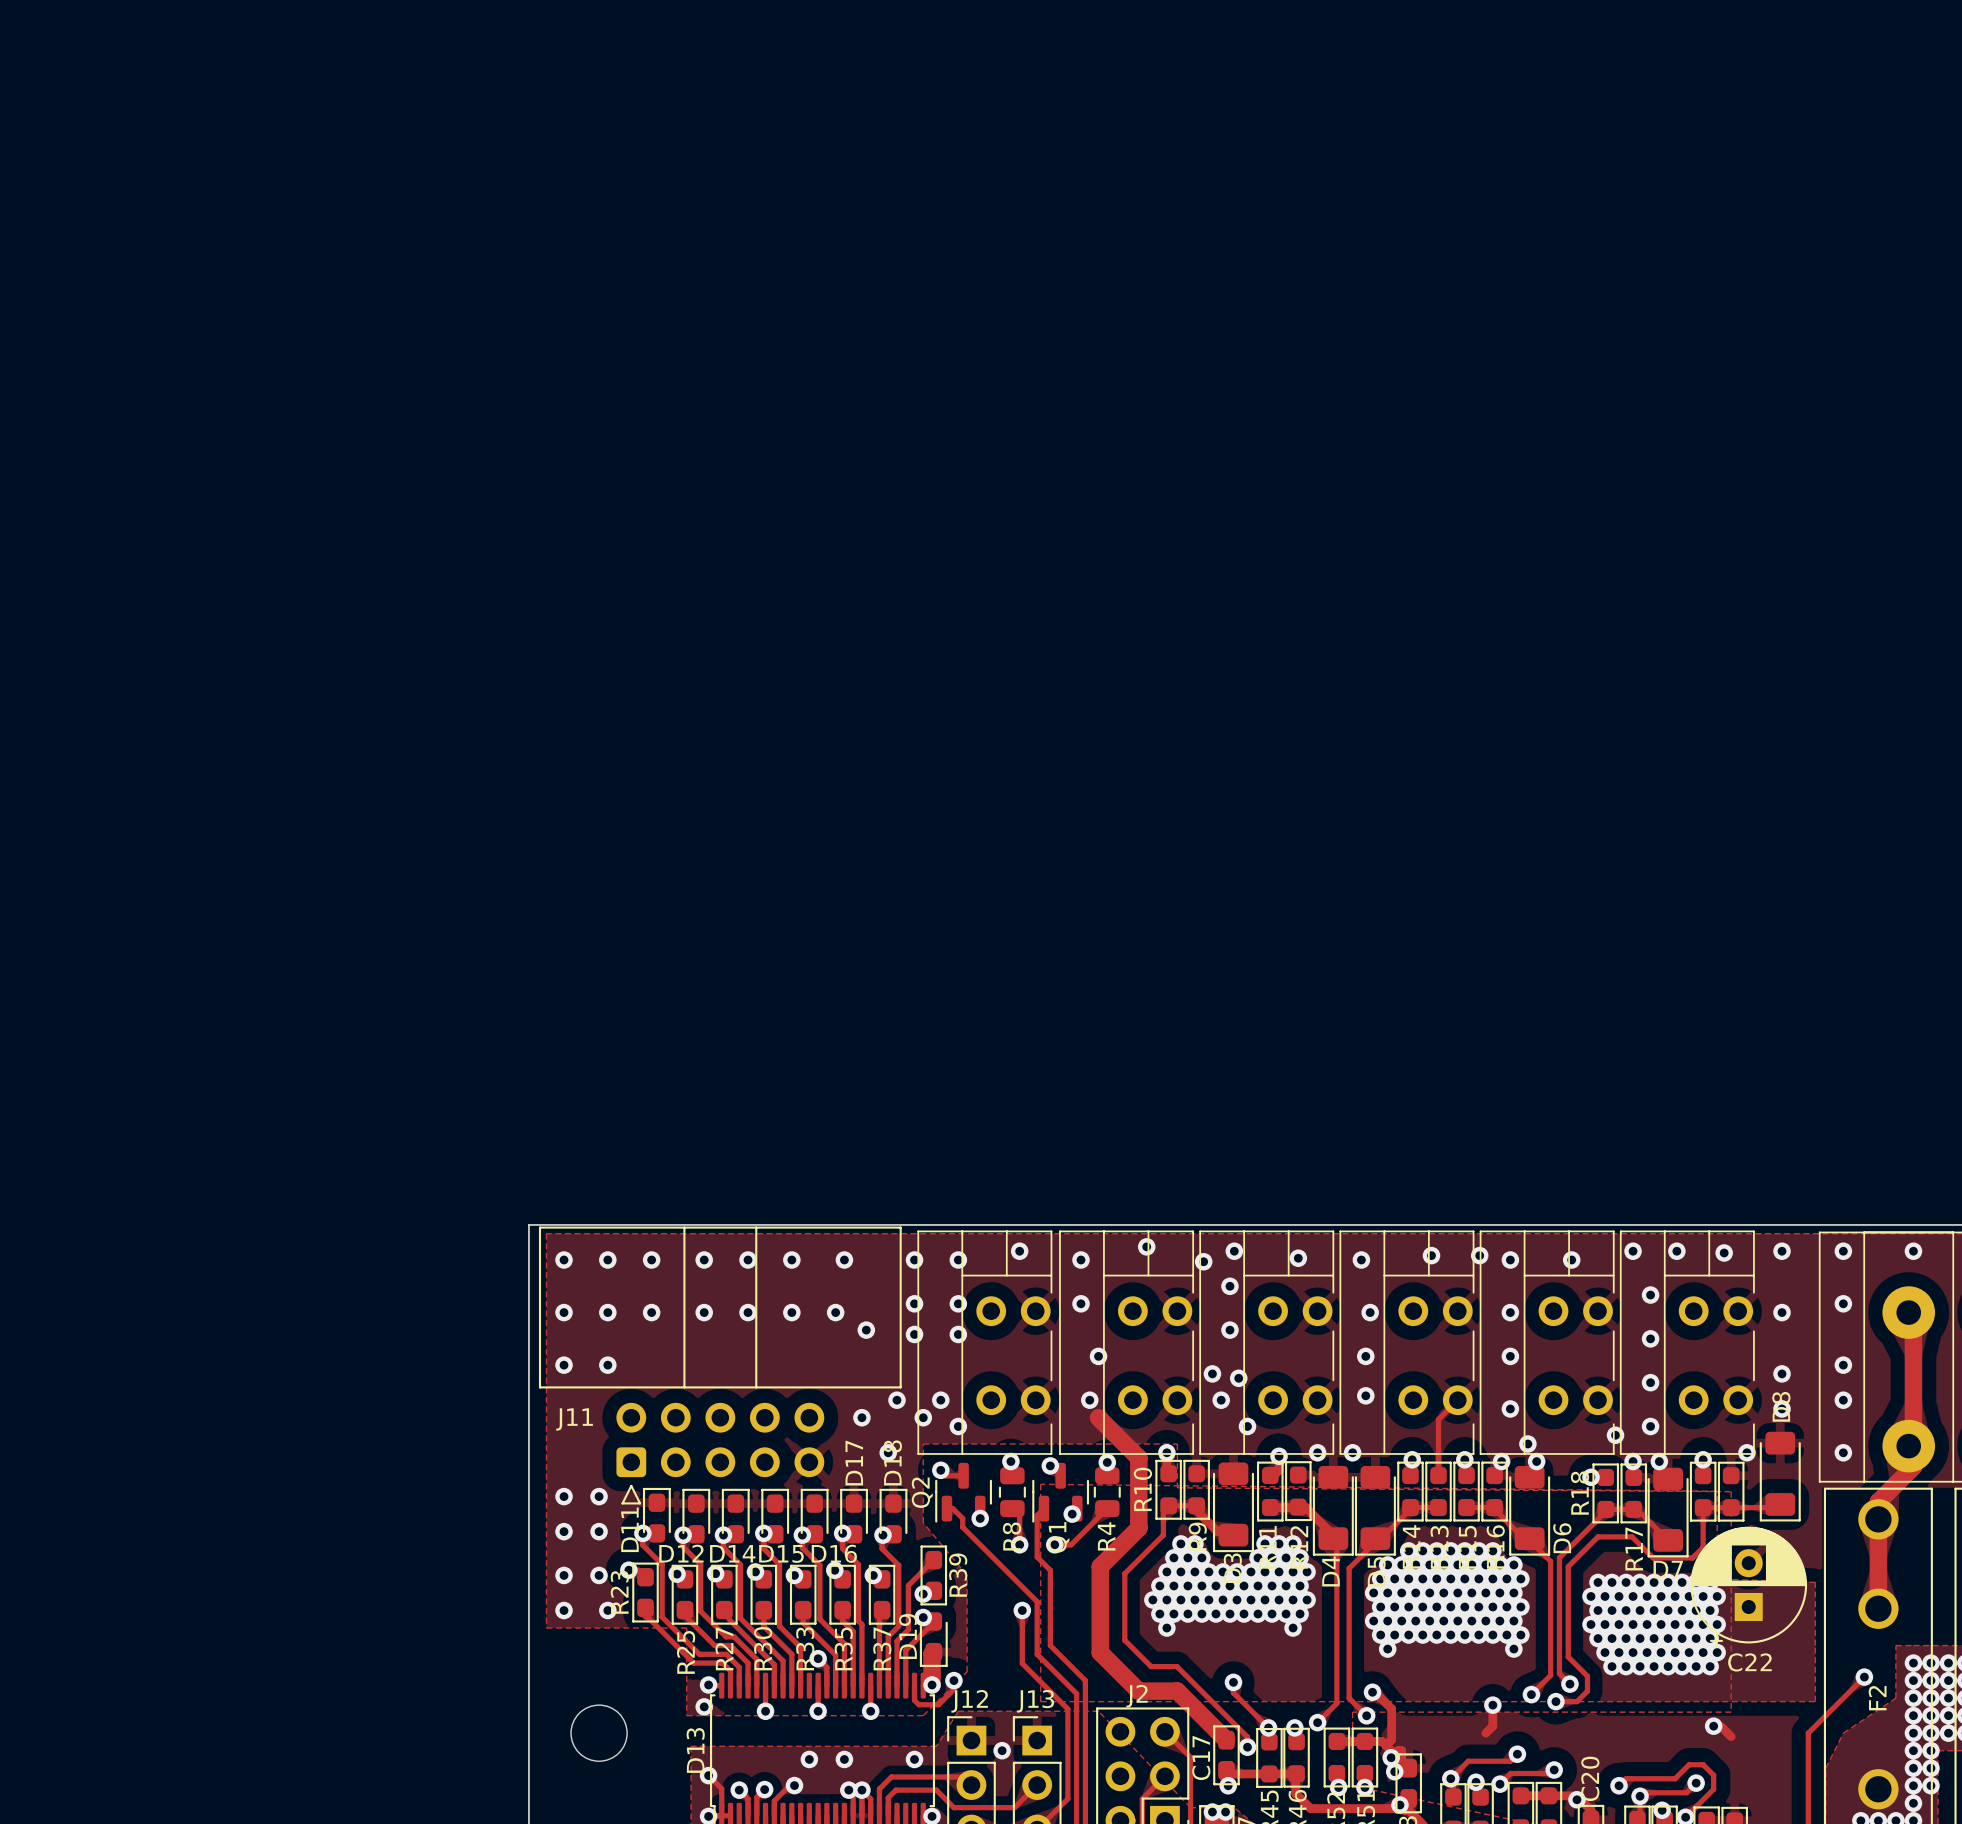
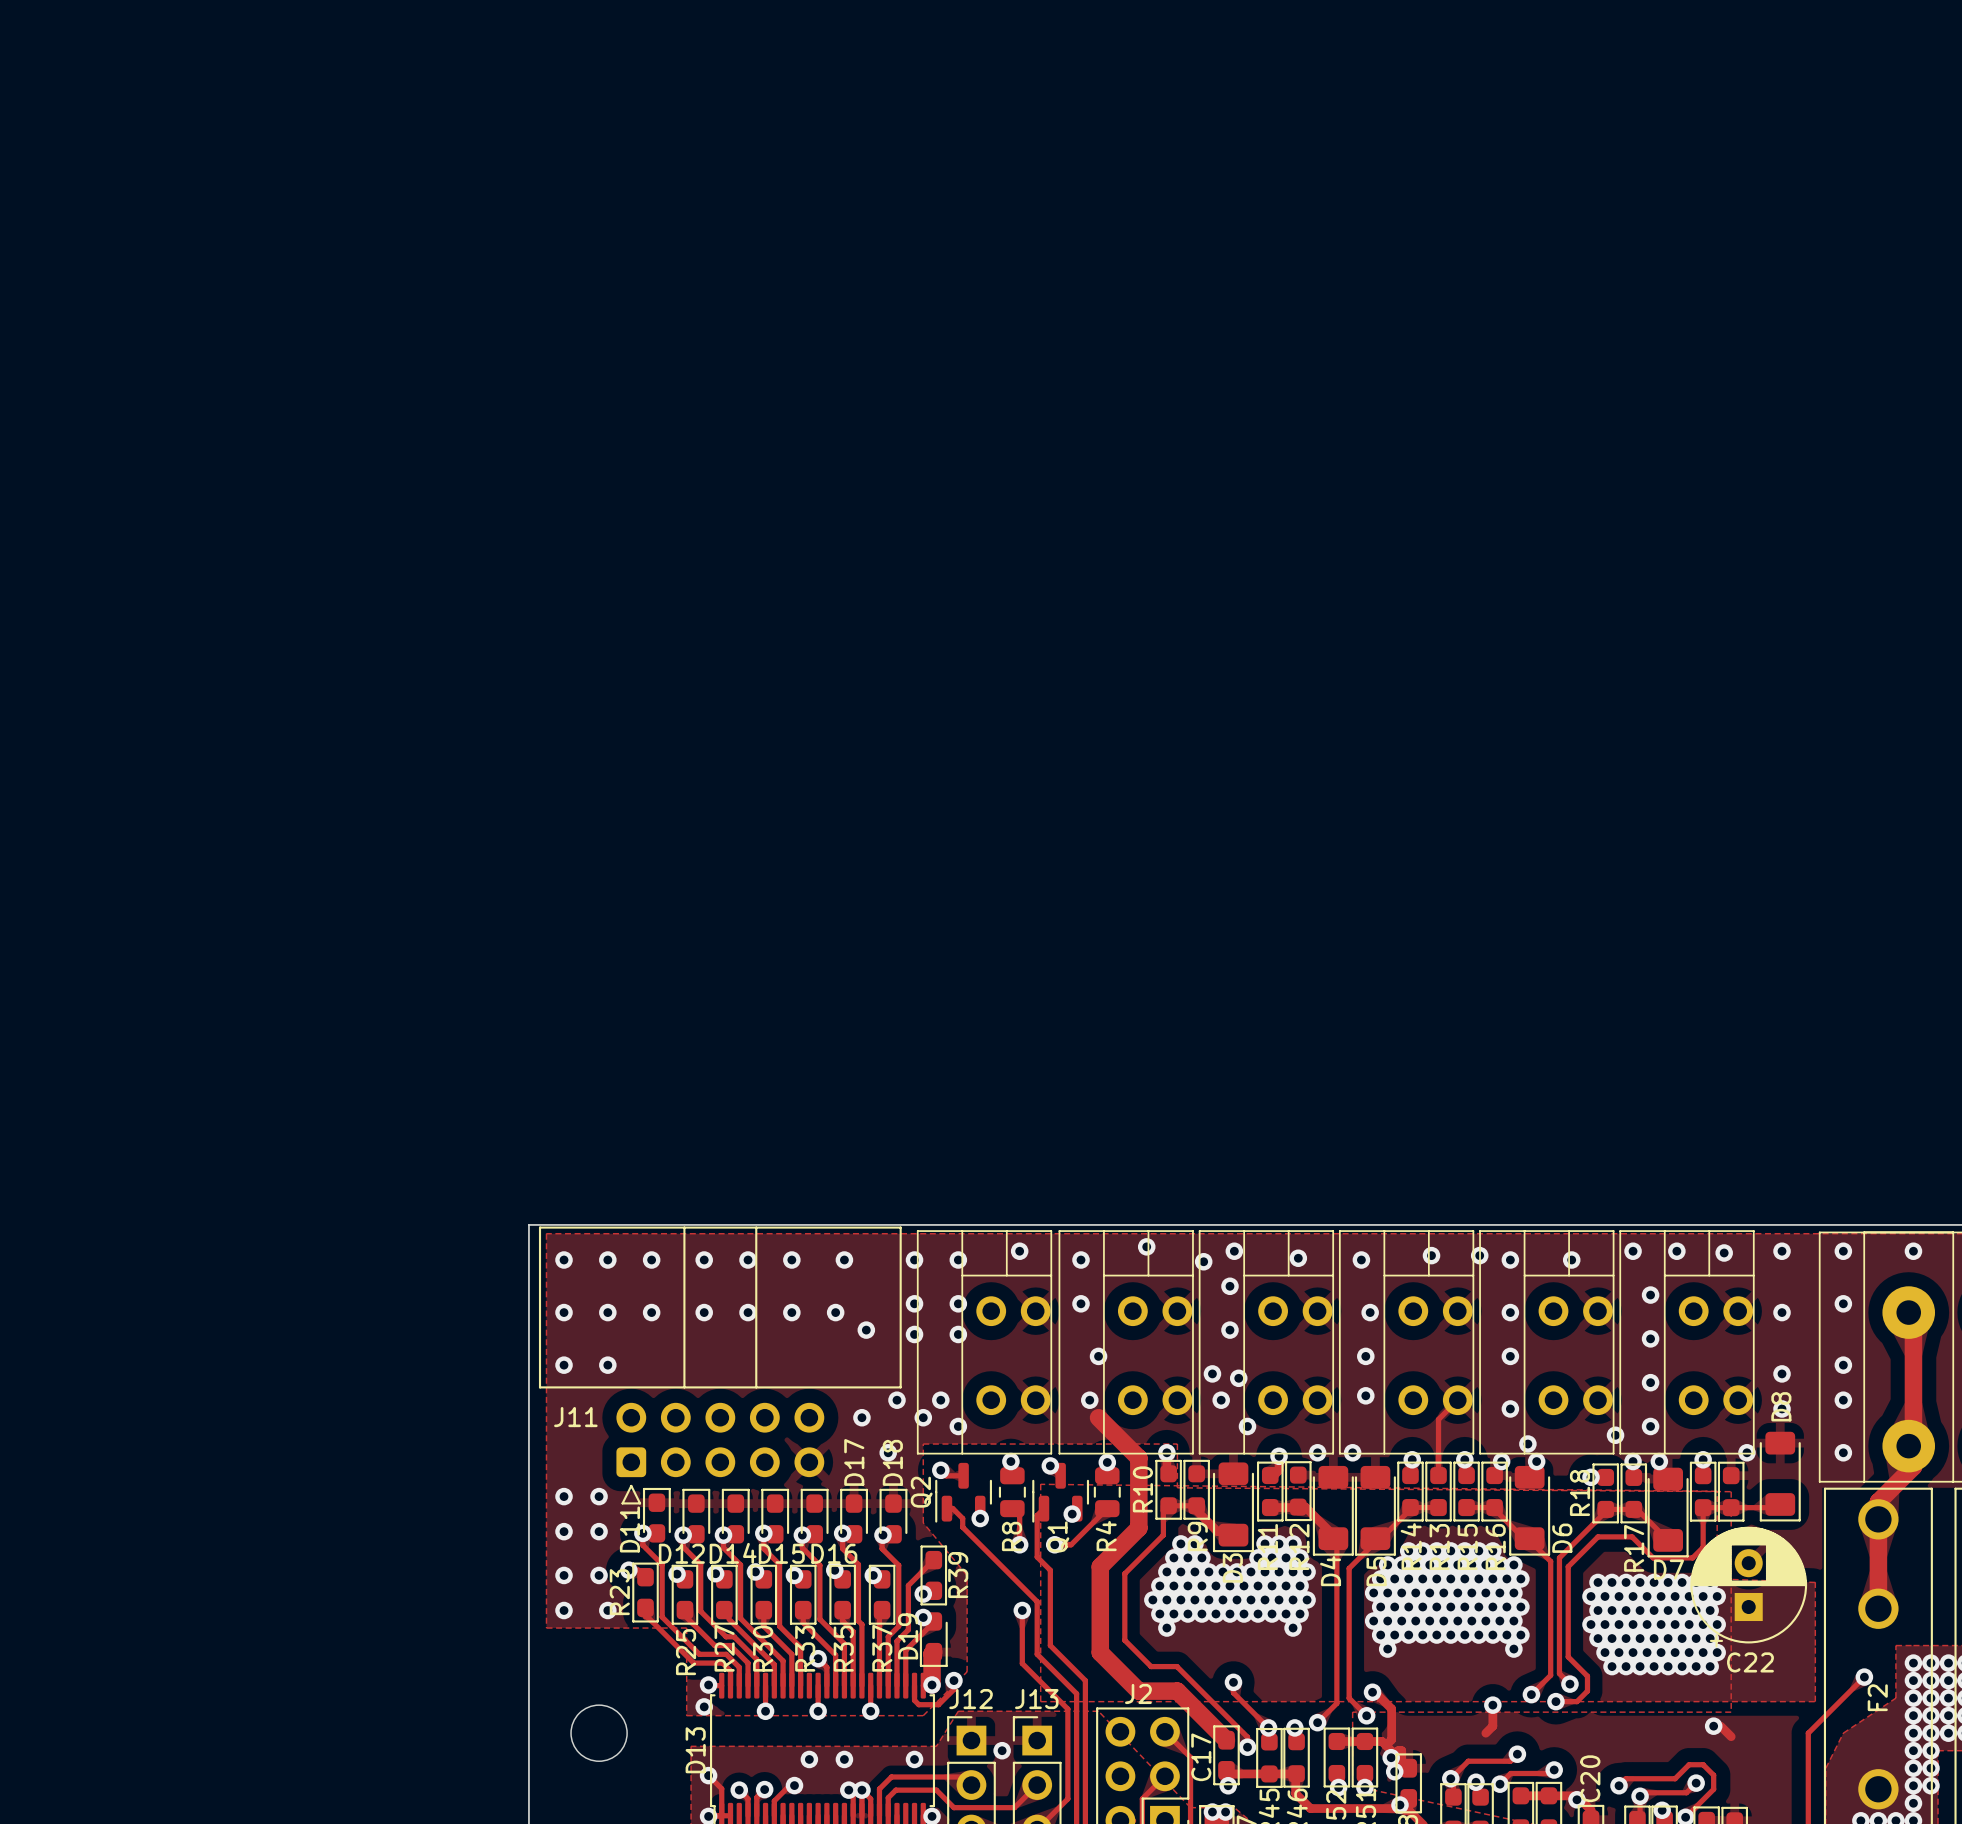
part footprint: [917, 1230, 1053, 1455] -> [916, 1230, 1053, 1455]
part footprint: [1059, 1230, 1195, 1455] -> [1058, 1230, 1194, 1455]
part footprint: [1199, 1230, 1335, 1455] -> [1198, 1230, 1335, 1455]
part footprint: [1339, 1230, 1475, 1455] -> [1338, 1230, 1475, 1455]
part footprint: [1479, 1230, 1615, 1455] -> [1479, 1230, 1615, 1455]
part footprint: [1619, 1230, 1755, 1455] -> [1619, 1230, 1755, 1455]

